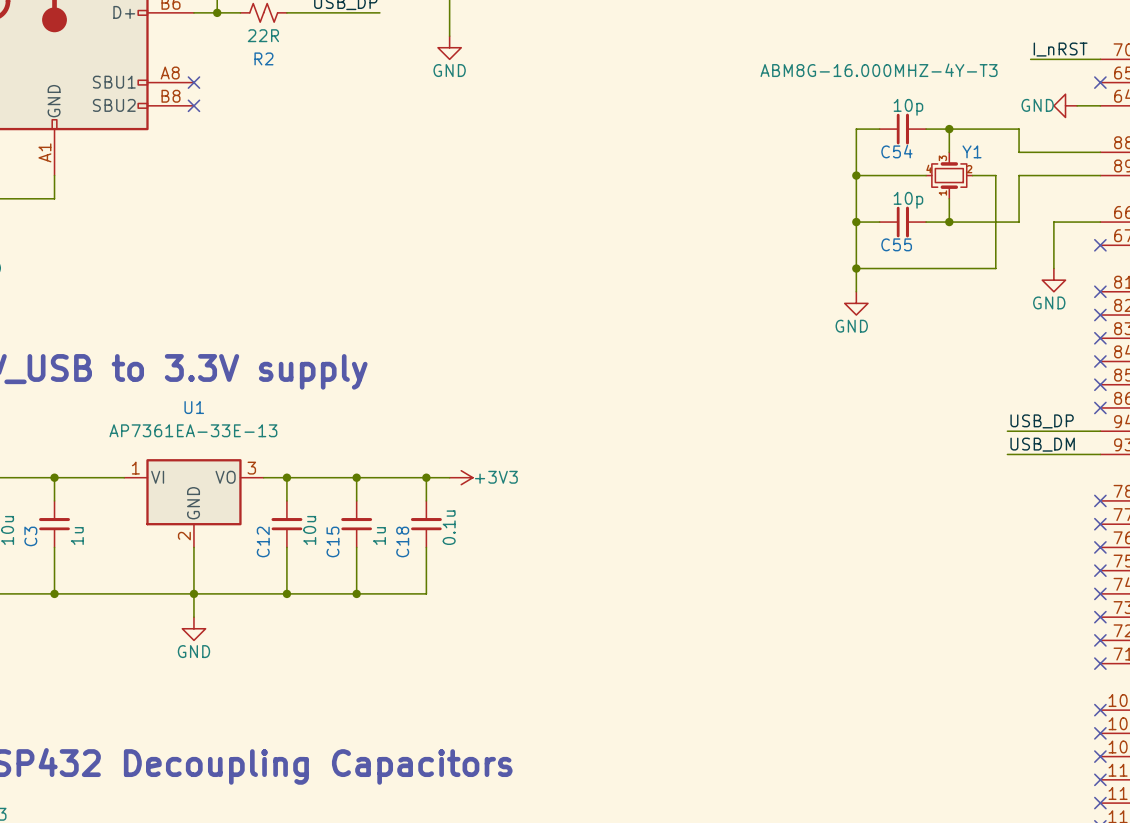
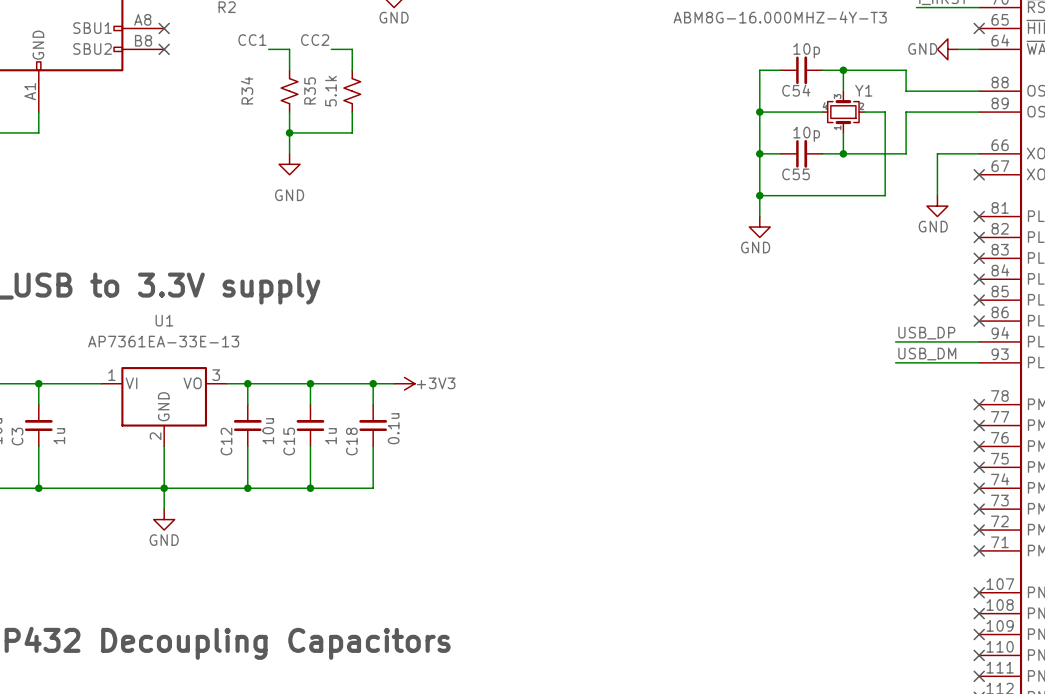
label: none -> CC1 (252, 40)
label: none -> CC2 (315, 40)
wire: none -> (268, 49) (289, 49) (289, 70)
wire: none -> (331, 49) (352, 49) (352, 70)
R34: none -> (289, 91)
R35: none -> 5.1k (352, 91)
wire: none -> (289, 112) (289, 153)
wire: none -> (352, 112) (352, 132) (289, 132)
junction: none -> (289, 132)
power symbol: none -> GND (289, 164)

